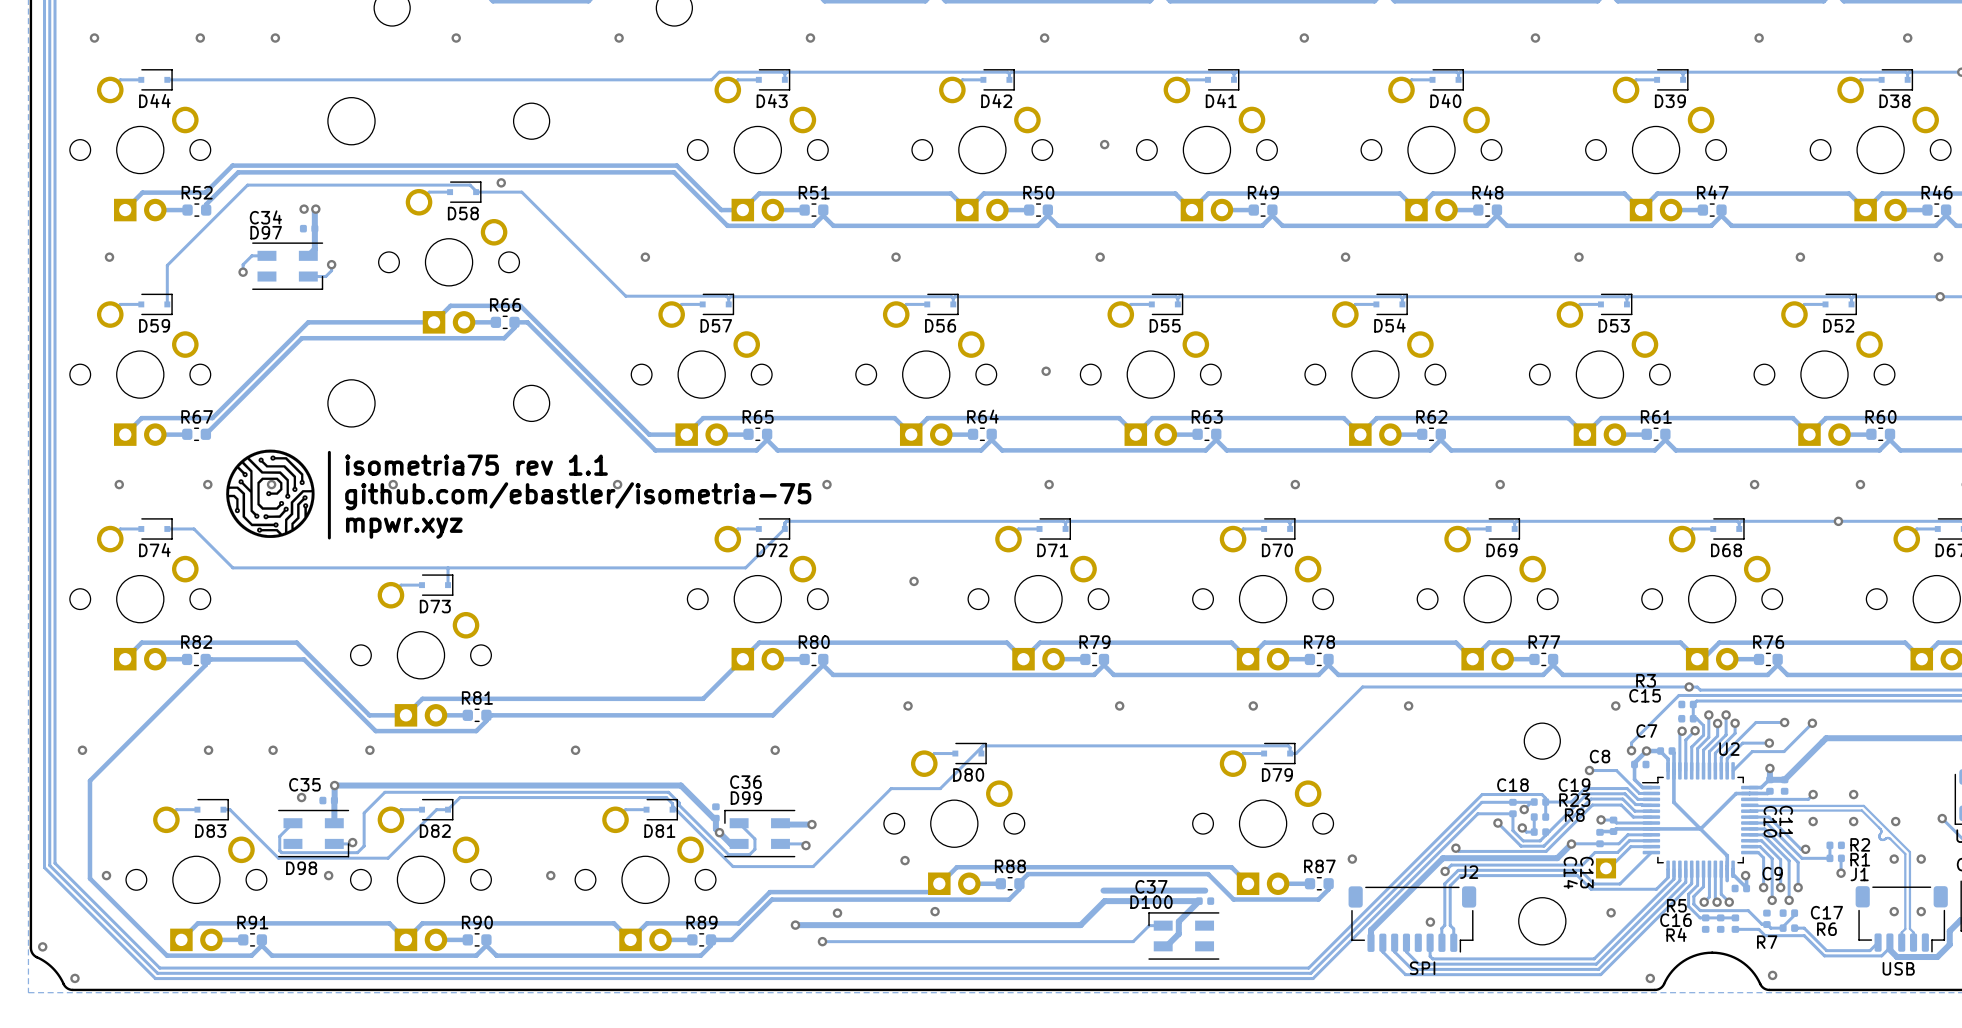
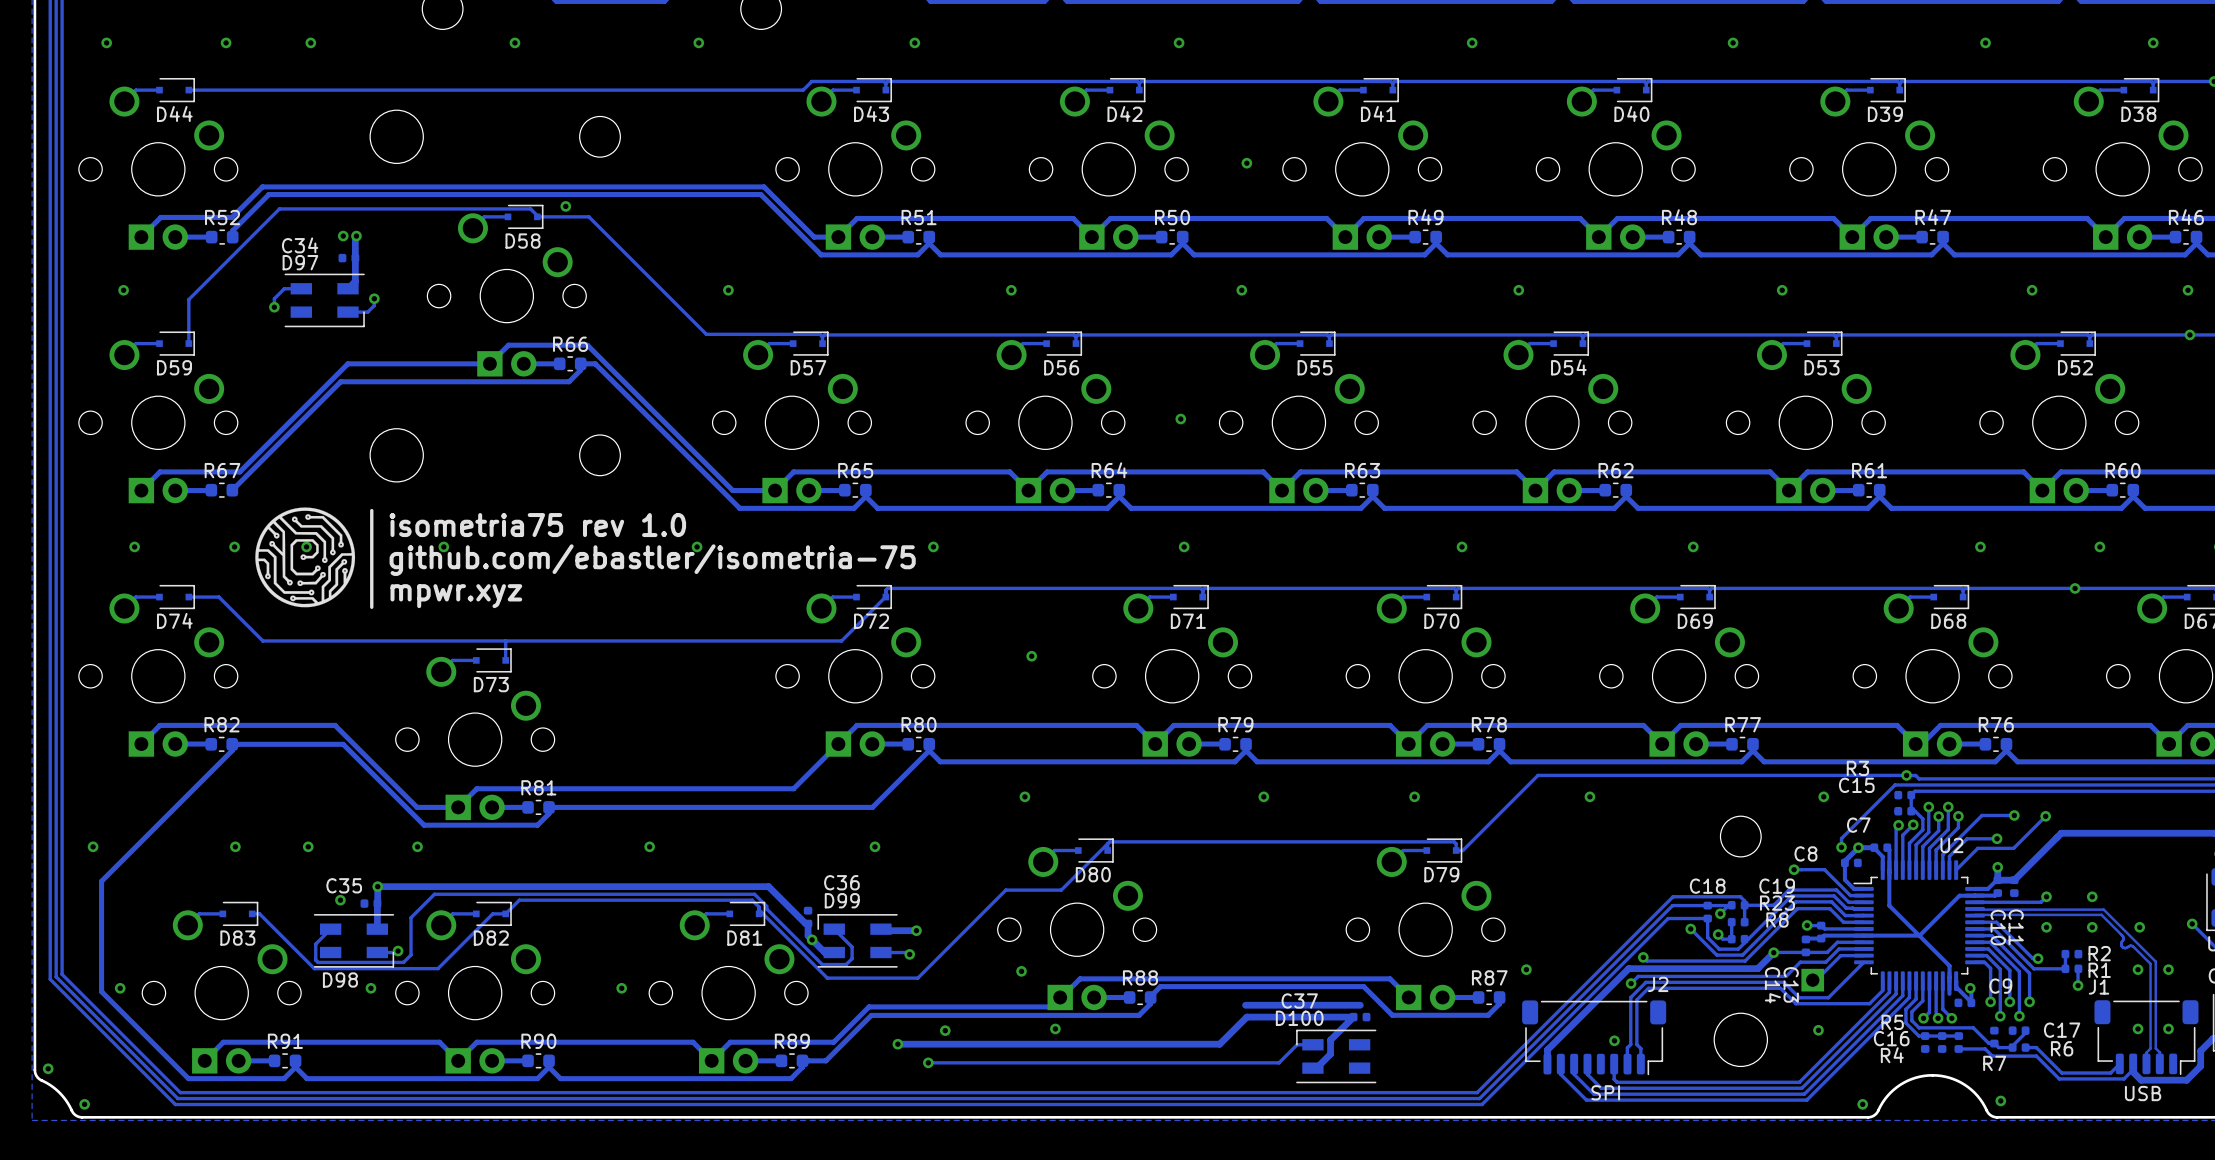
text: isometria75 rev 1.1 (476, 465) -> isometria75 rev 1.0 (537, 525)

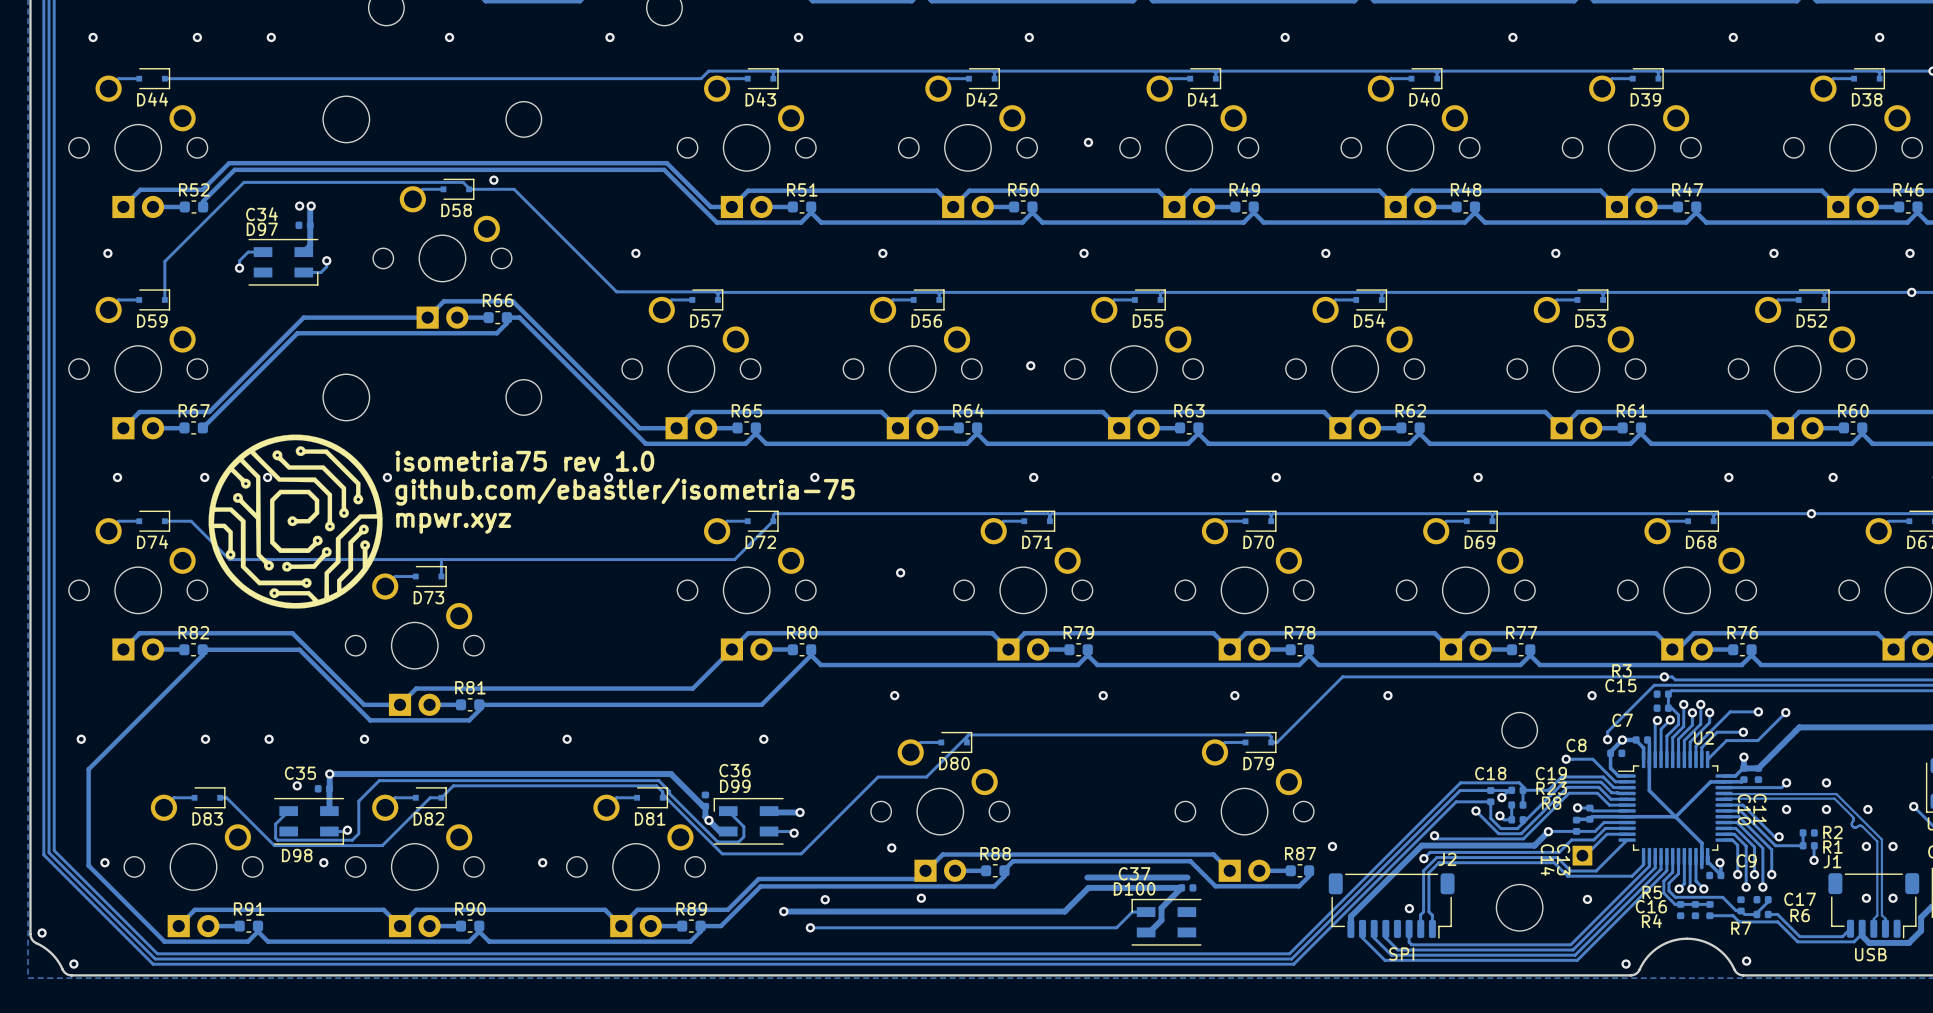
drawing: none -> [208, 434, 383, 609]
drawing: [255, 507, 356, 608] -> none
line: (371, 510) (371, 607) -> none
text position: isometria75 rev 1.0 (537, 525) -> isometria75 rev 1.0 (524, 461)
text position: github.com/ebastler/isometria-75 (652, 560) -> github.com/ebastler/isometria-75 (625, 491)
text position: mpwr.xyz (456, 596) -> mpwr.xyz (453, 523)

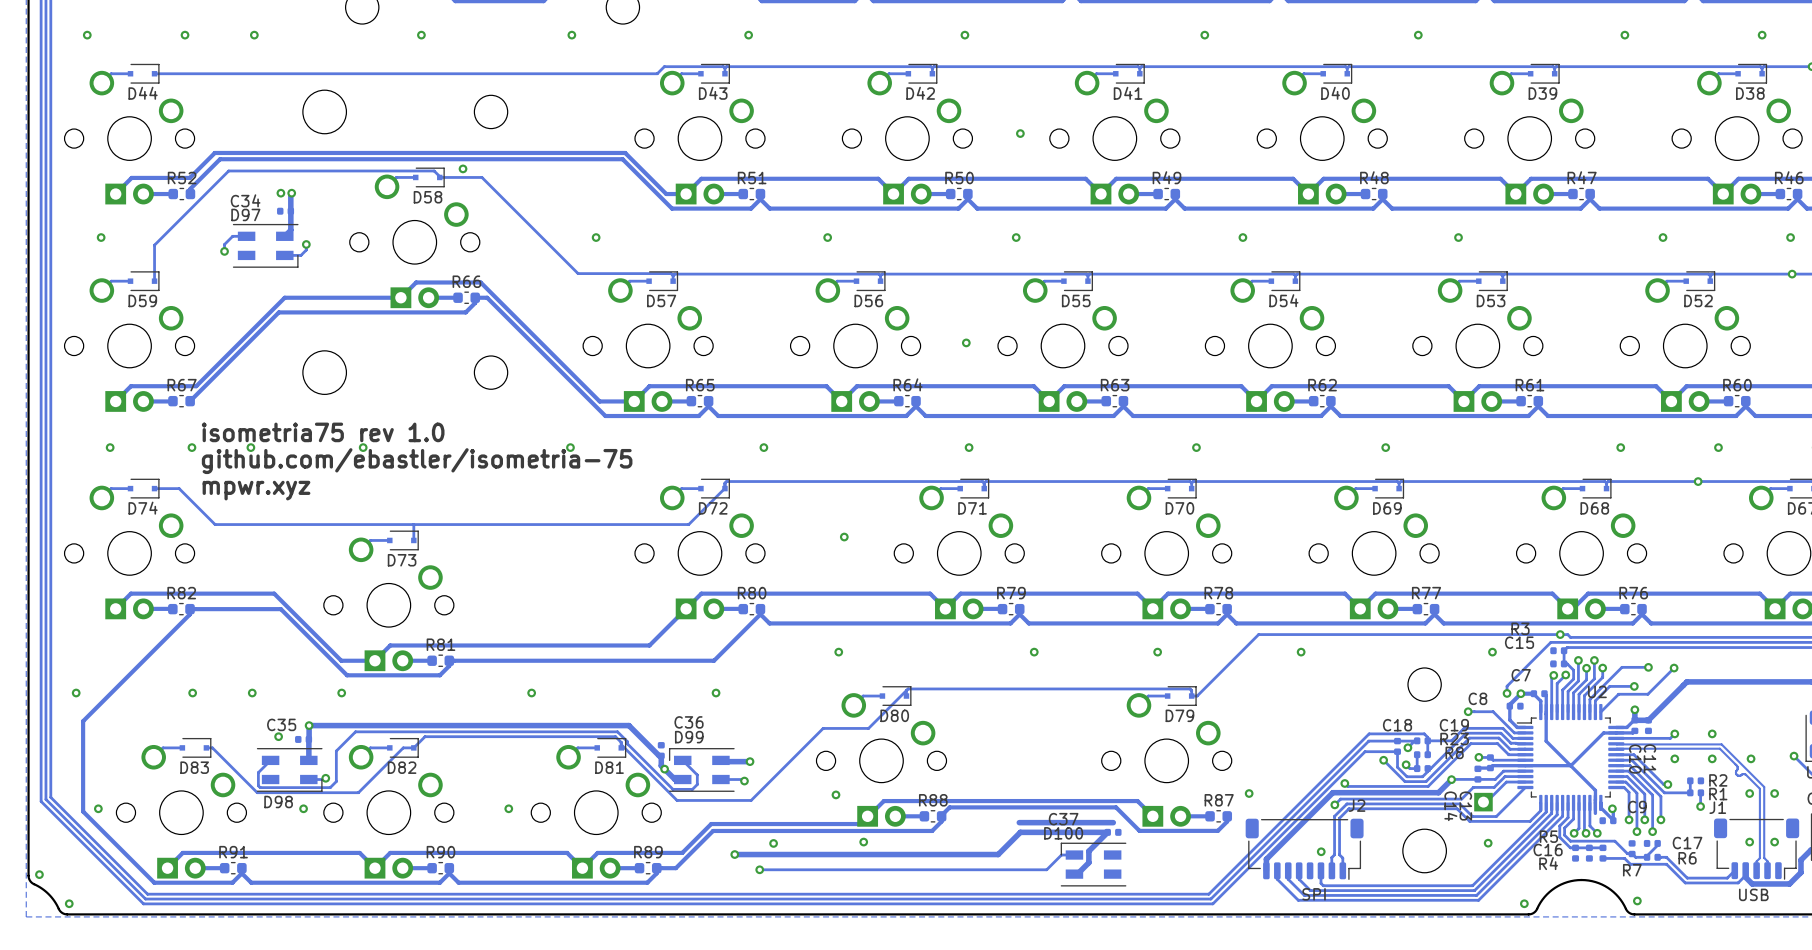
drawing: [208, 434, 383, 609] -> none
text position: isometria75 rev 1.0 (524, 461) -> isometria75 rev 1.0 (323, 432)
text position: github.com/ebastler/isometria-75 (625, 491) -> github.com/ebastler/isometria-75 (417, 461)
text position: mpwr.xyz (453, 523) -> mpwr.xyz (256, 490)

